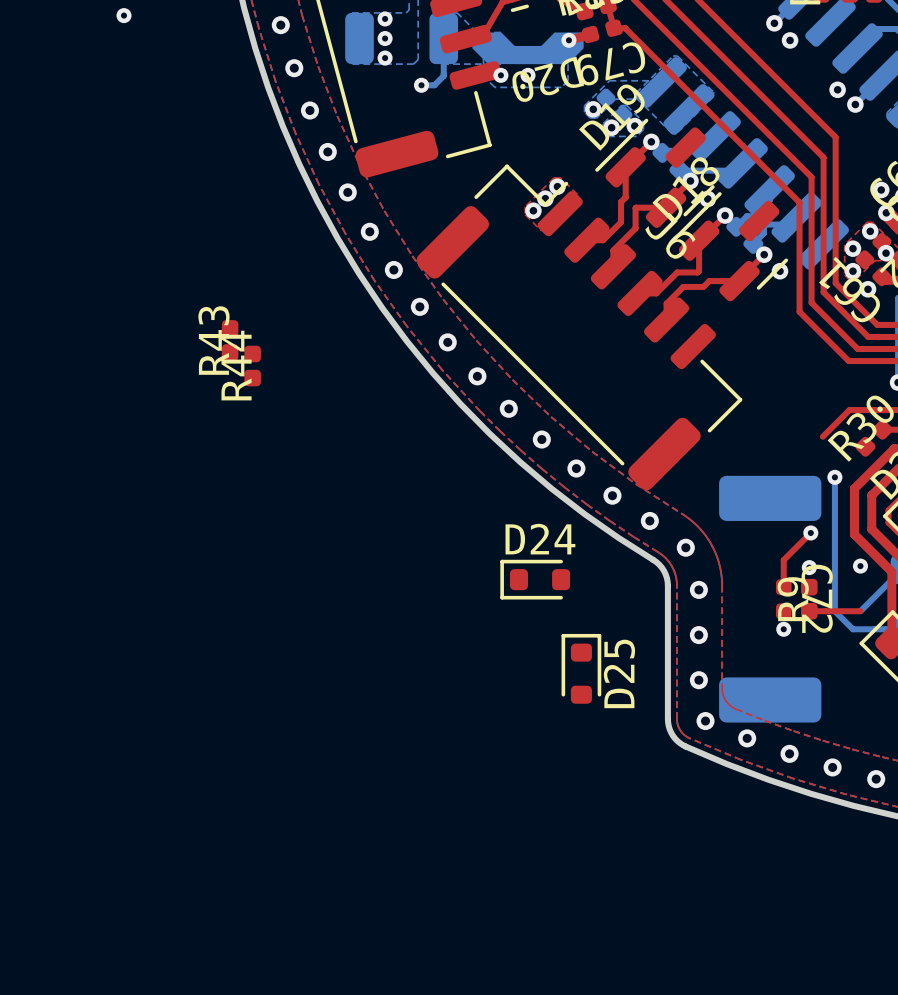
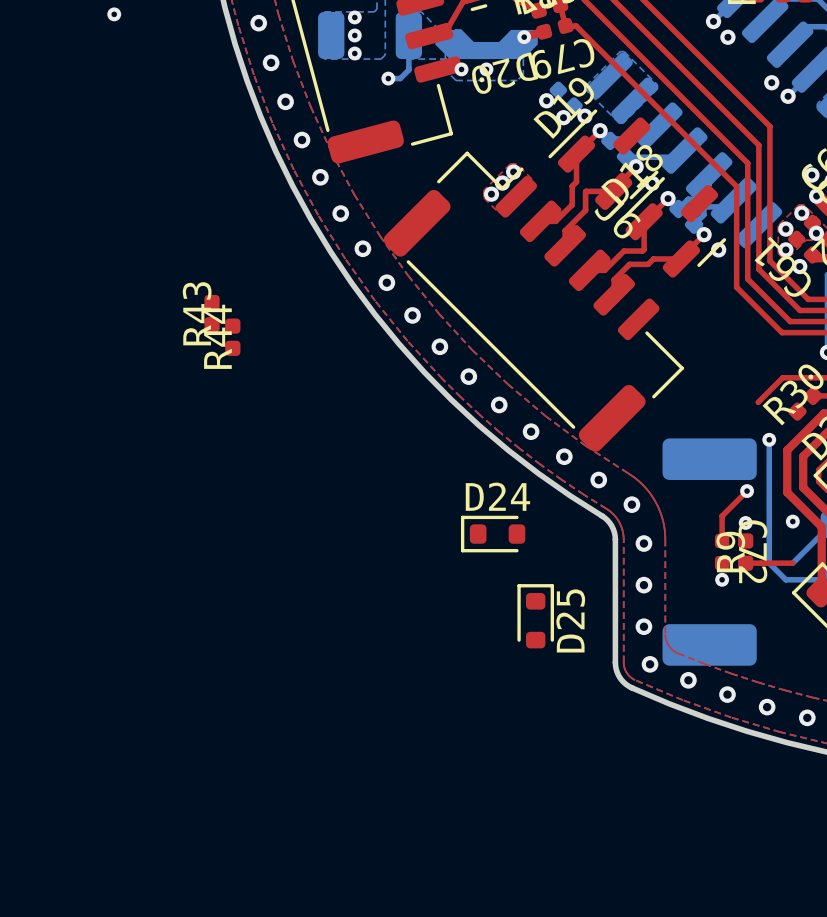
bottom zone outline: (609, 80) (650, 80) (650, 92) (644, 99) (615, 99) (596, 118) (590, 118) (584, 112) (584, 105) (609, 80) -> none
bottom zone outline: (603, 123) (603, 130) (608, 136) (636, 136) (643, 129) (643, 122) (626, 105) (621, 105) (603, 123) -> none

